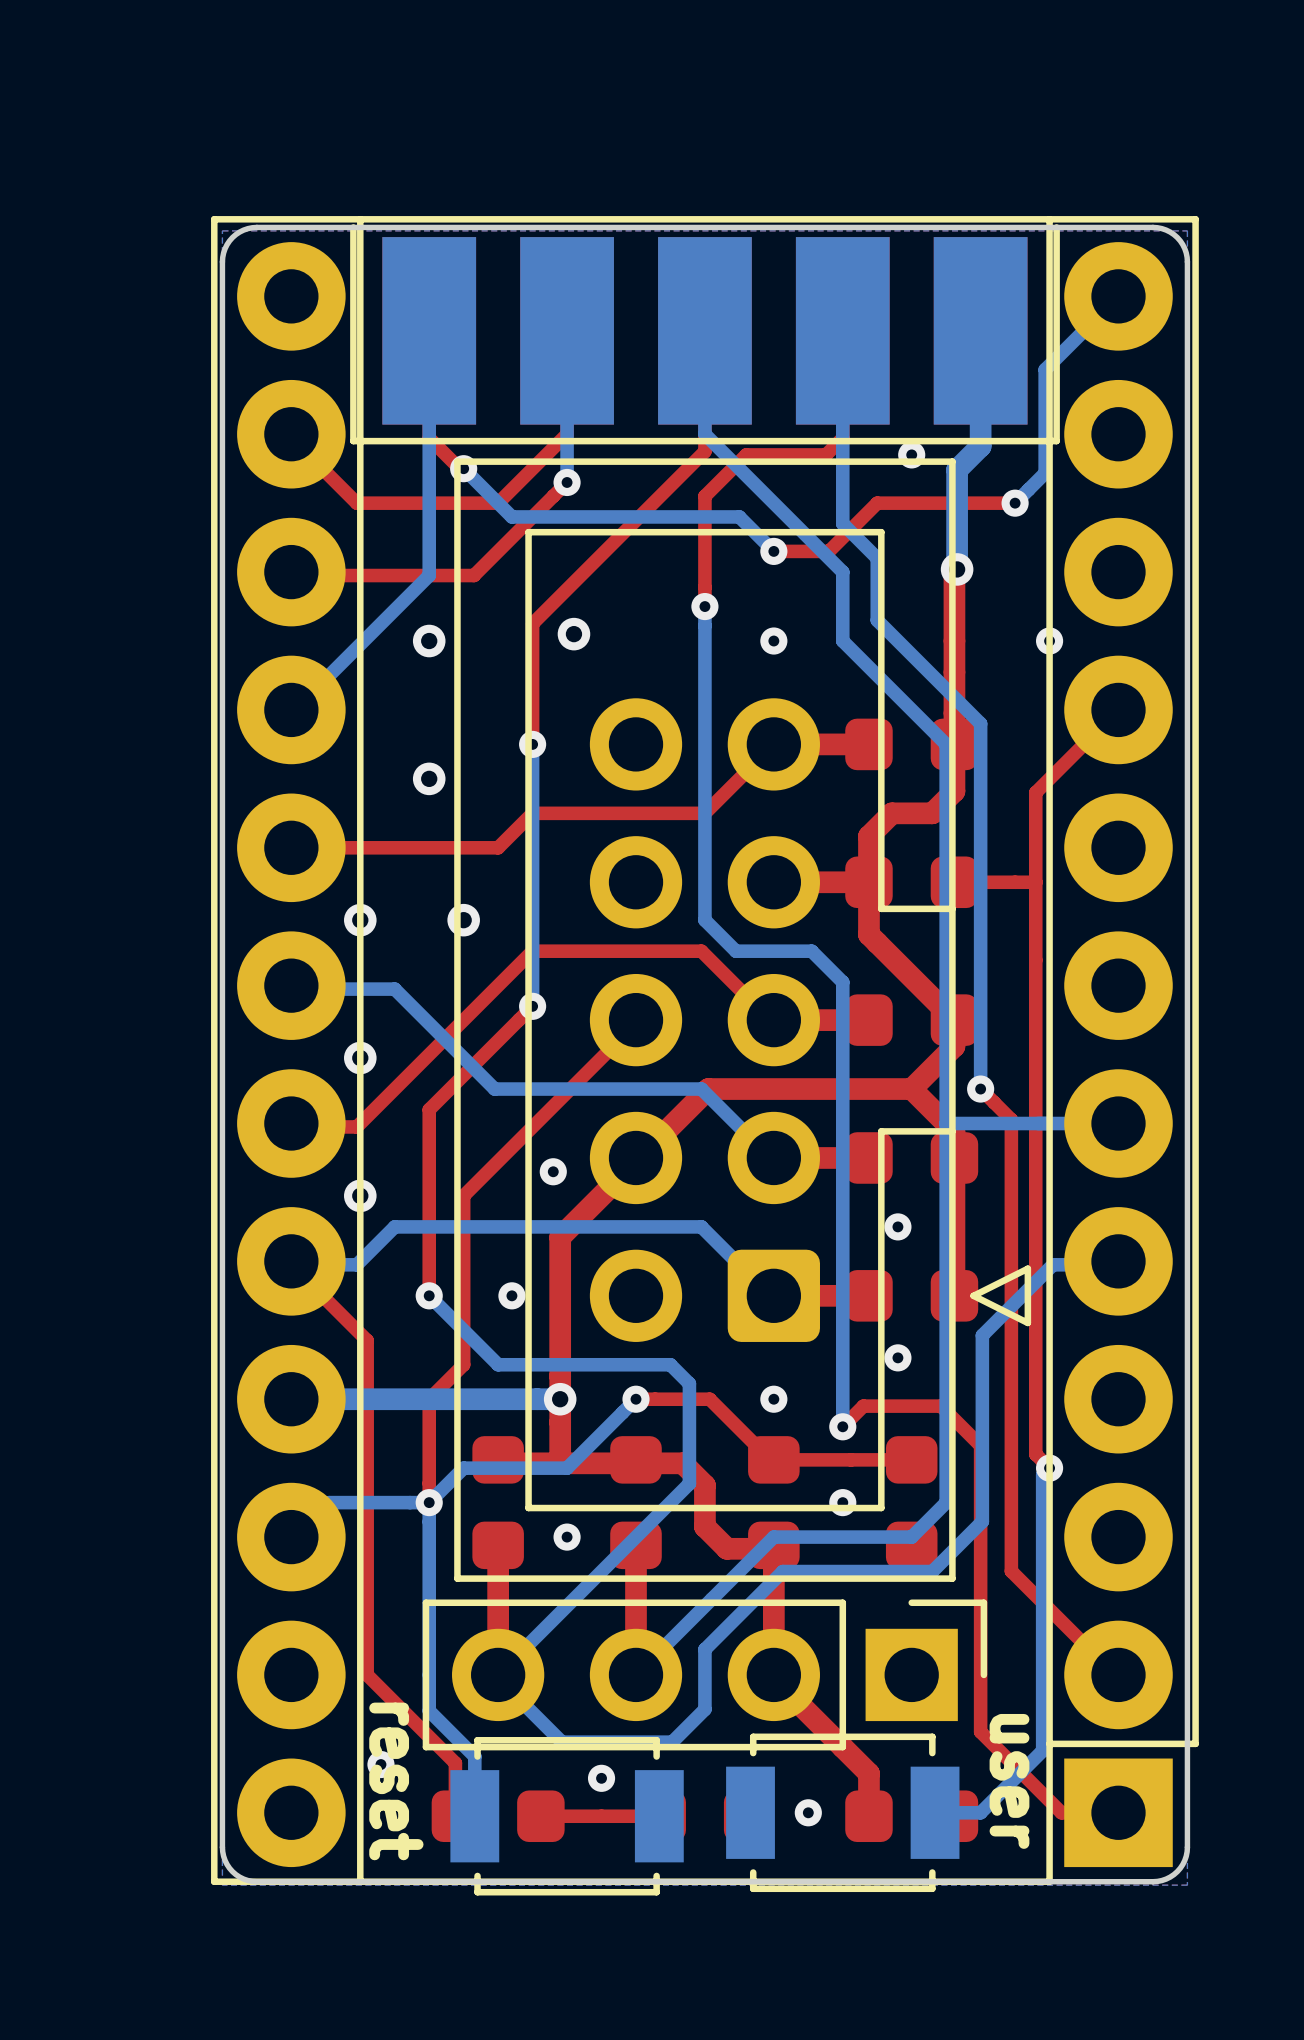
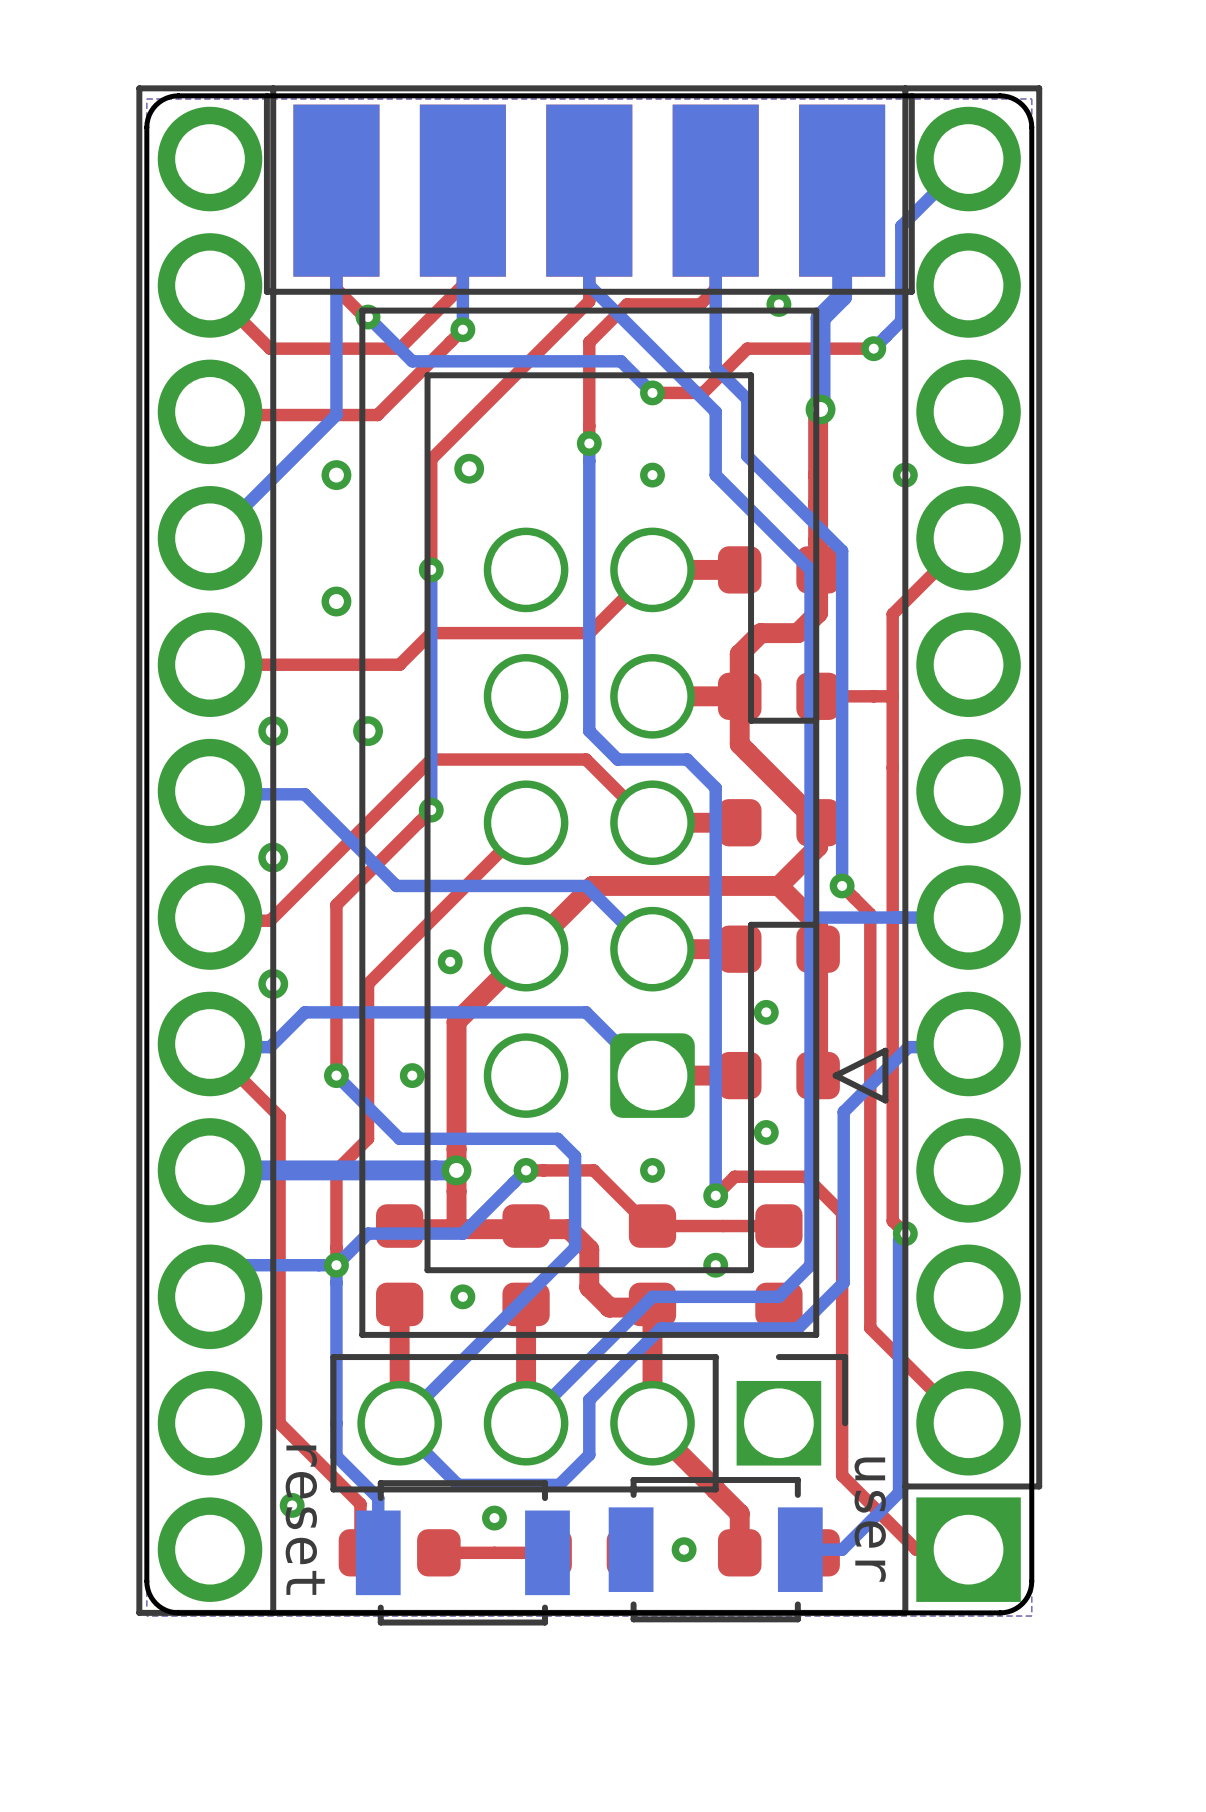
part footprint: [211, 216, 1199, 1885] -> [136, 85, 1043, 1616]
part footprint: [454, 458, 1032, 1582] -> [359, 307, 889, 1338]
part footprint: [422, 1599, 988, 1751] -> [330, 1354, 849, 1493]

